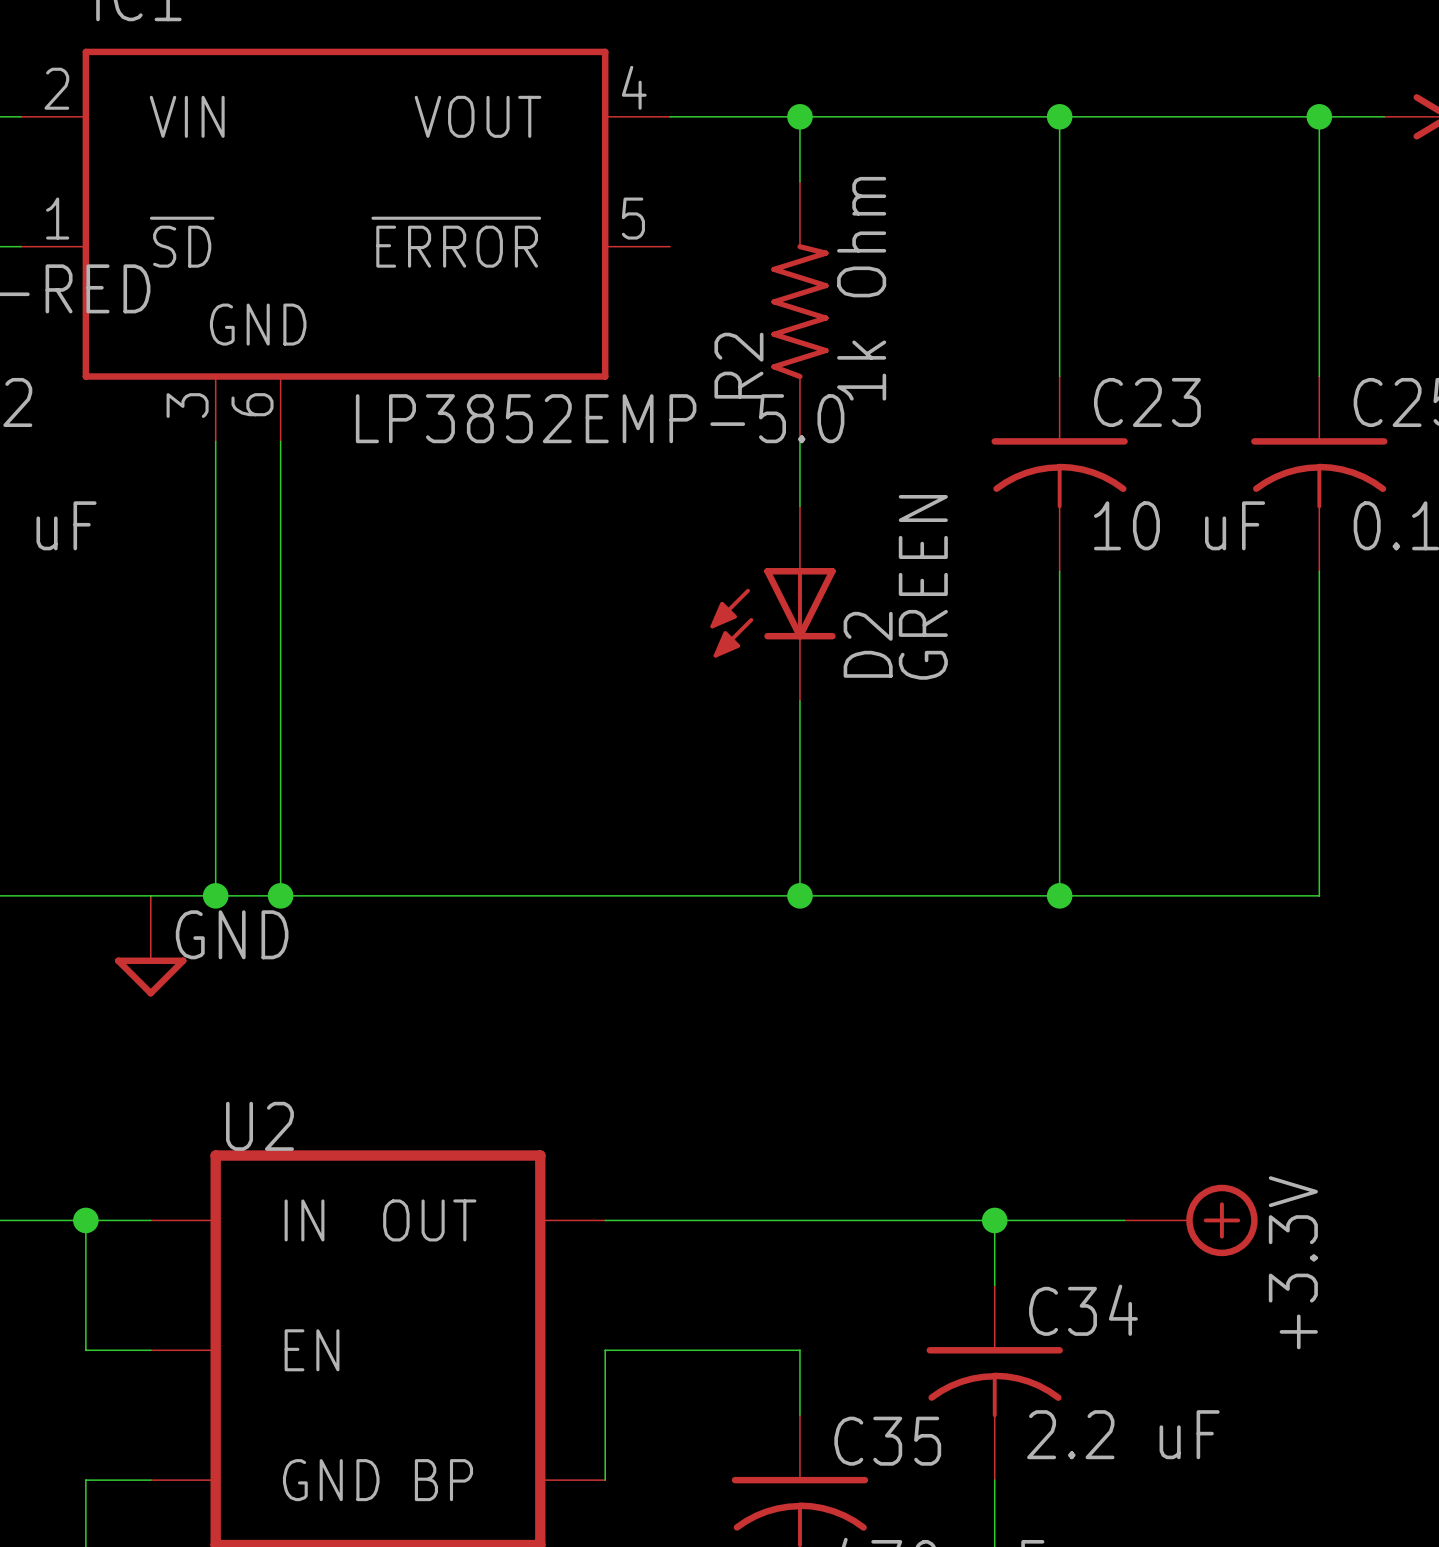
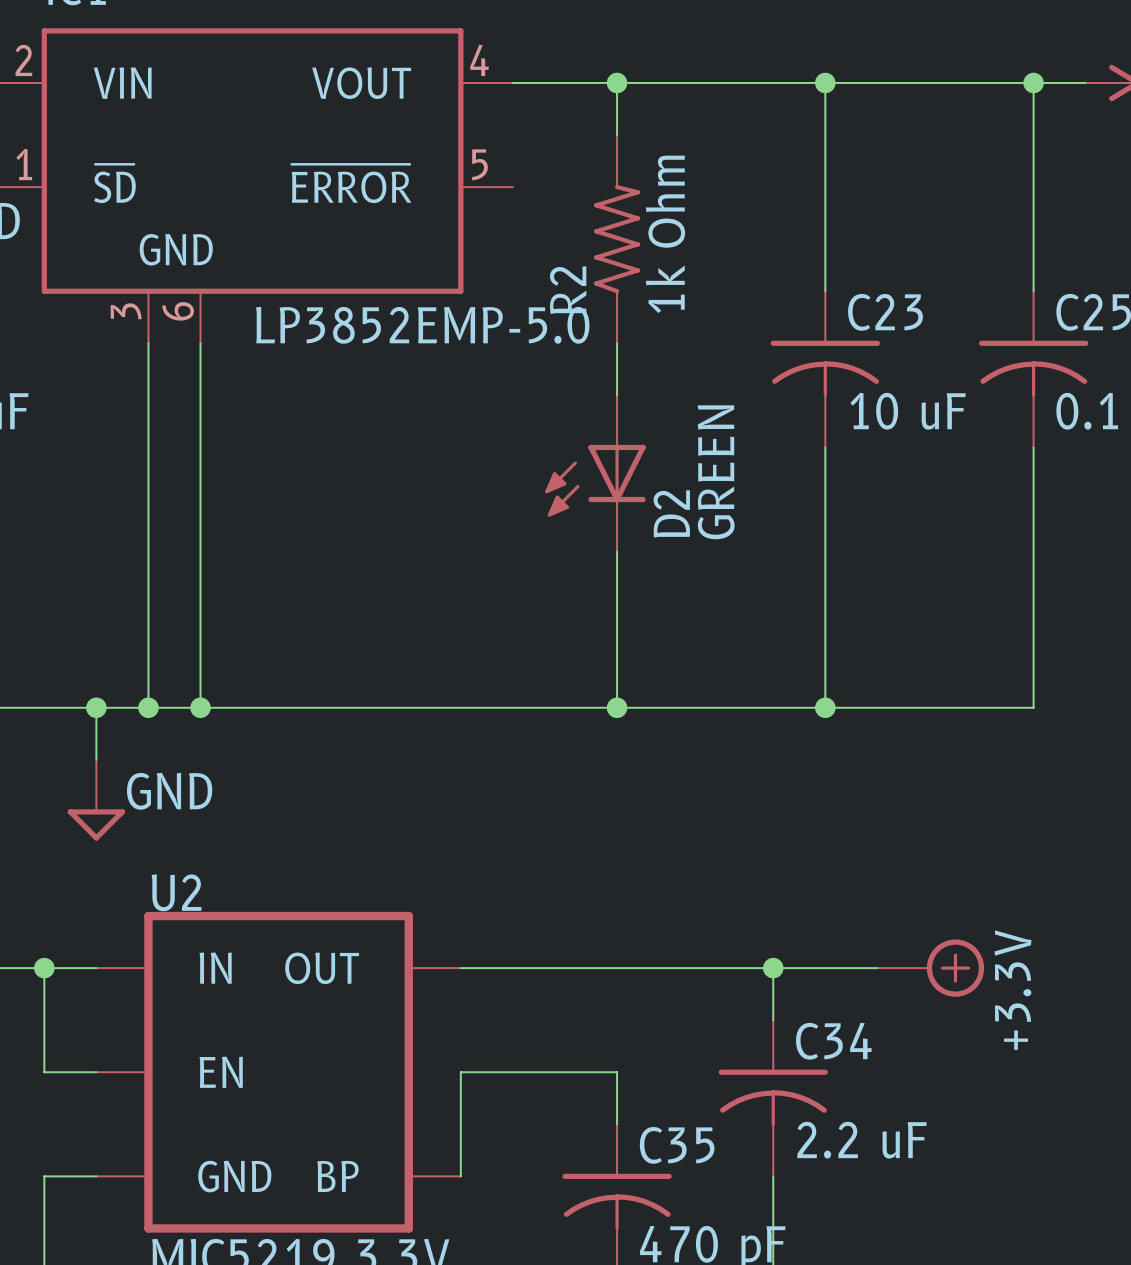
junction: none -> (96, 707)
power symbol position: GND (150, 946) -> GND (96, 800)

